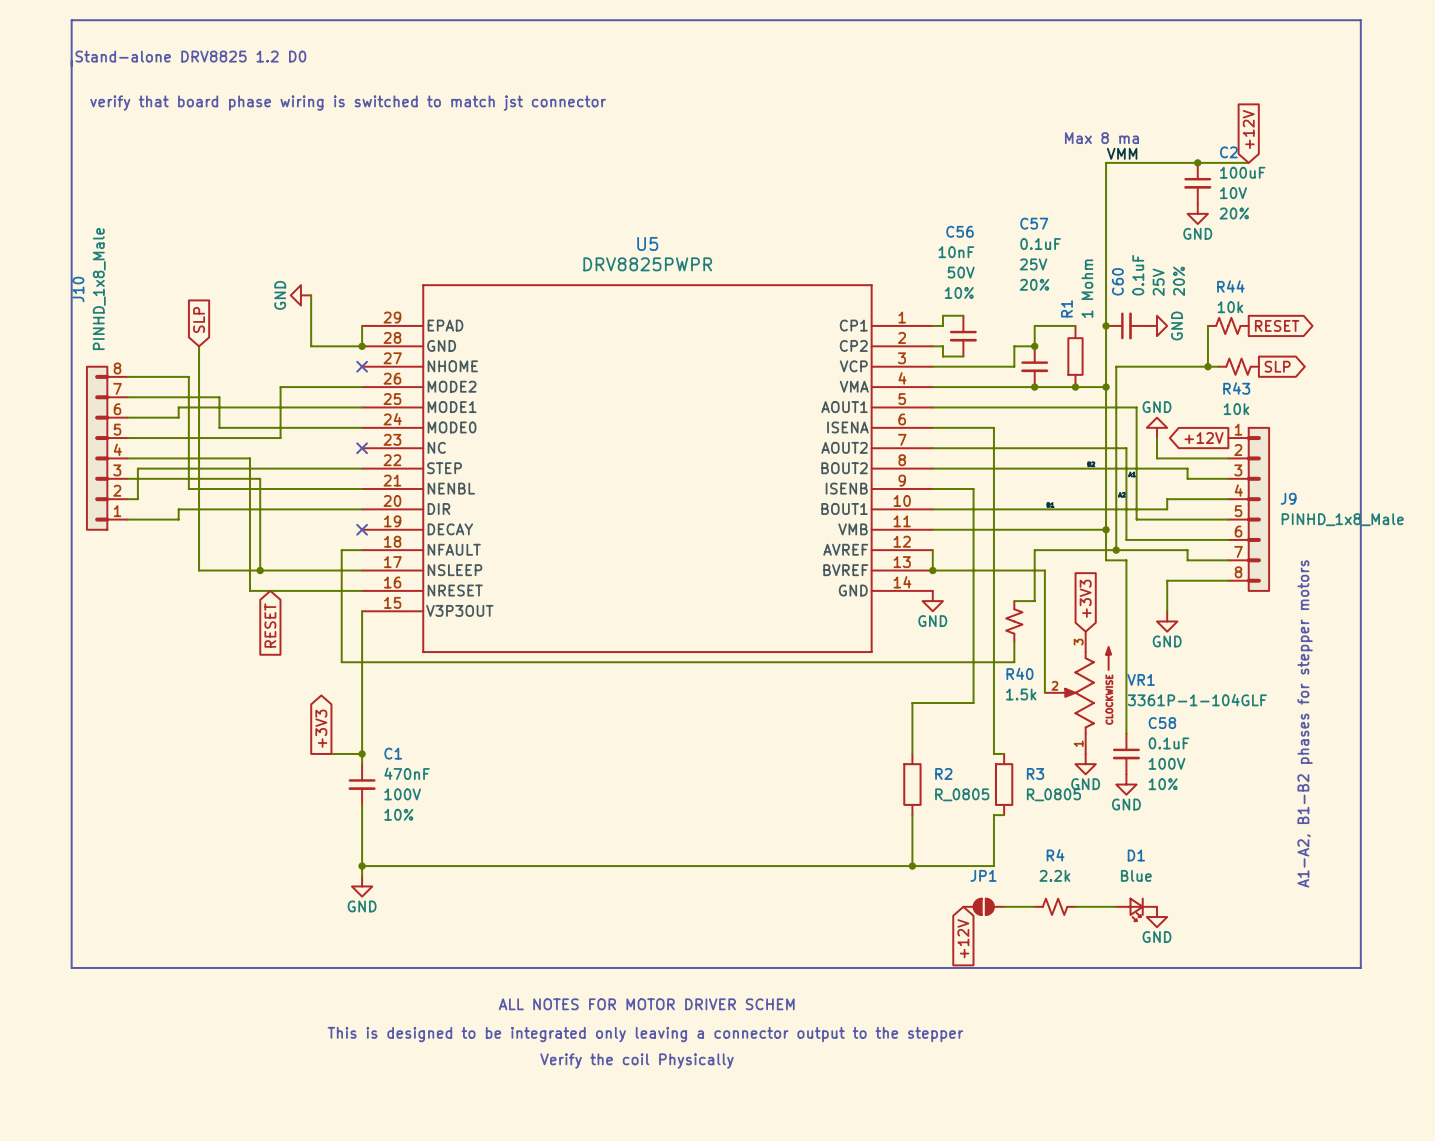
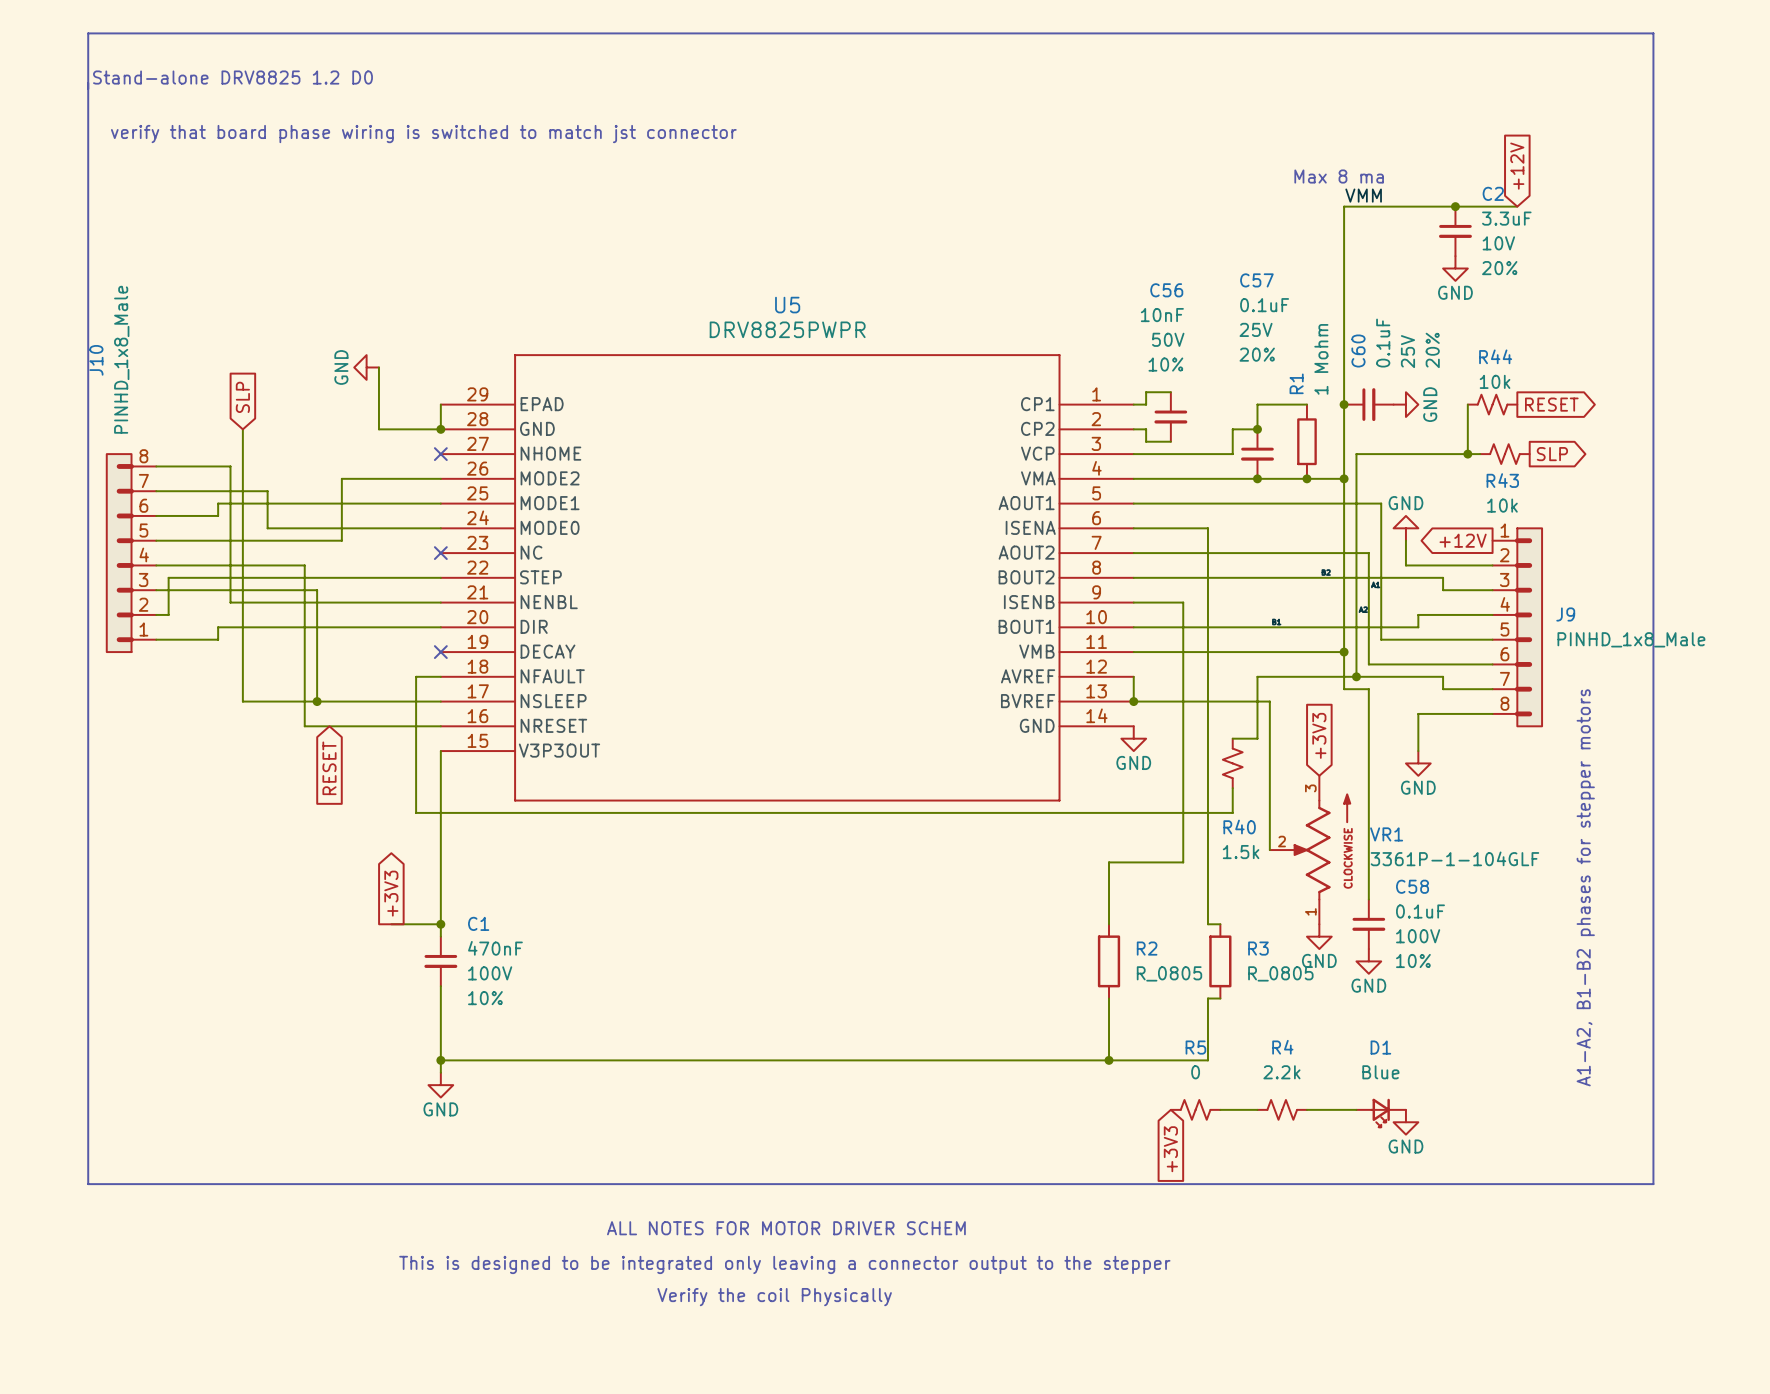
C2 value: 100uF (1242, 172) -> 3.3uF (1506, 218)
JP1: (983, 906) -> none
R5: none -> 0 (1195, 1109)
global label: +12V (963, 938) -> +3V3 (1170, 1149)

